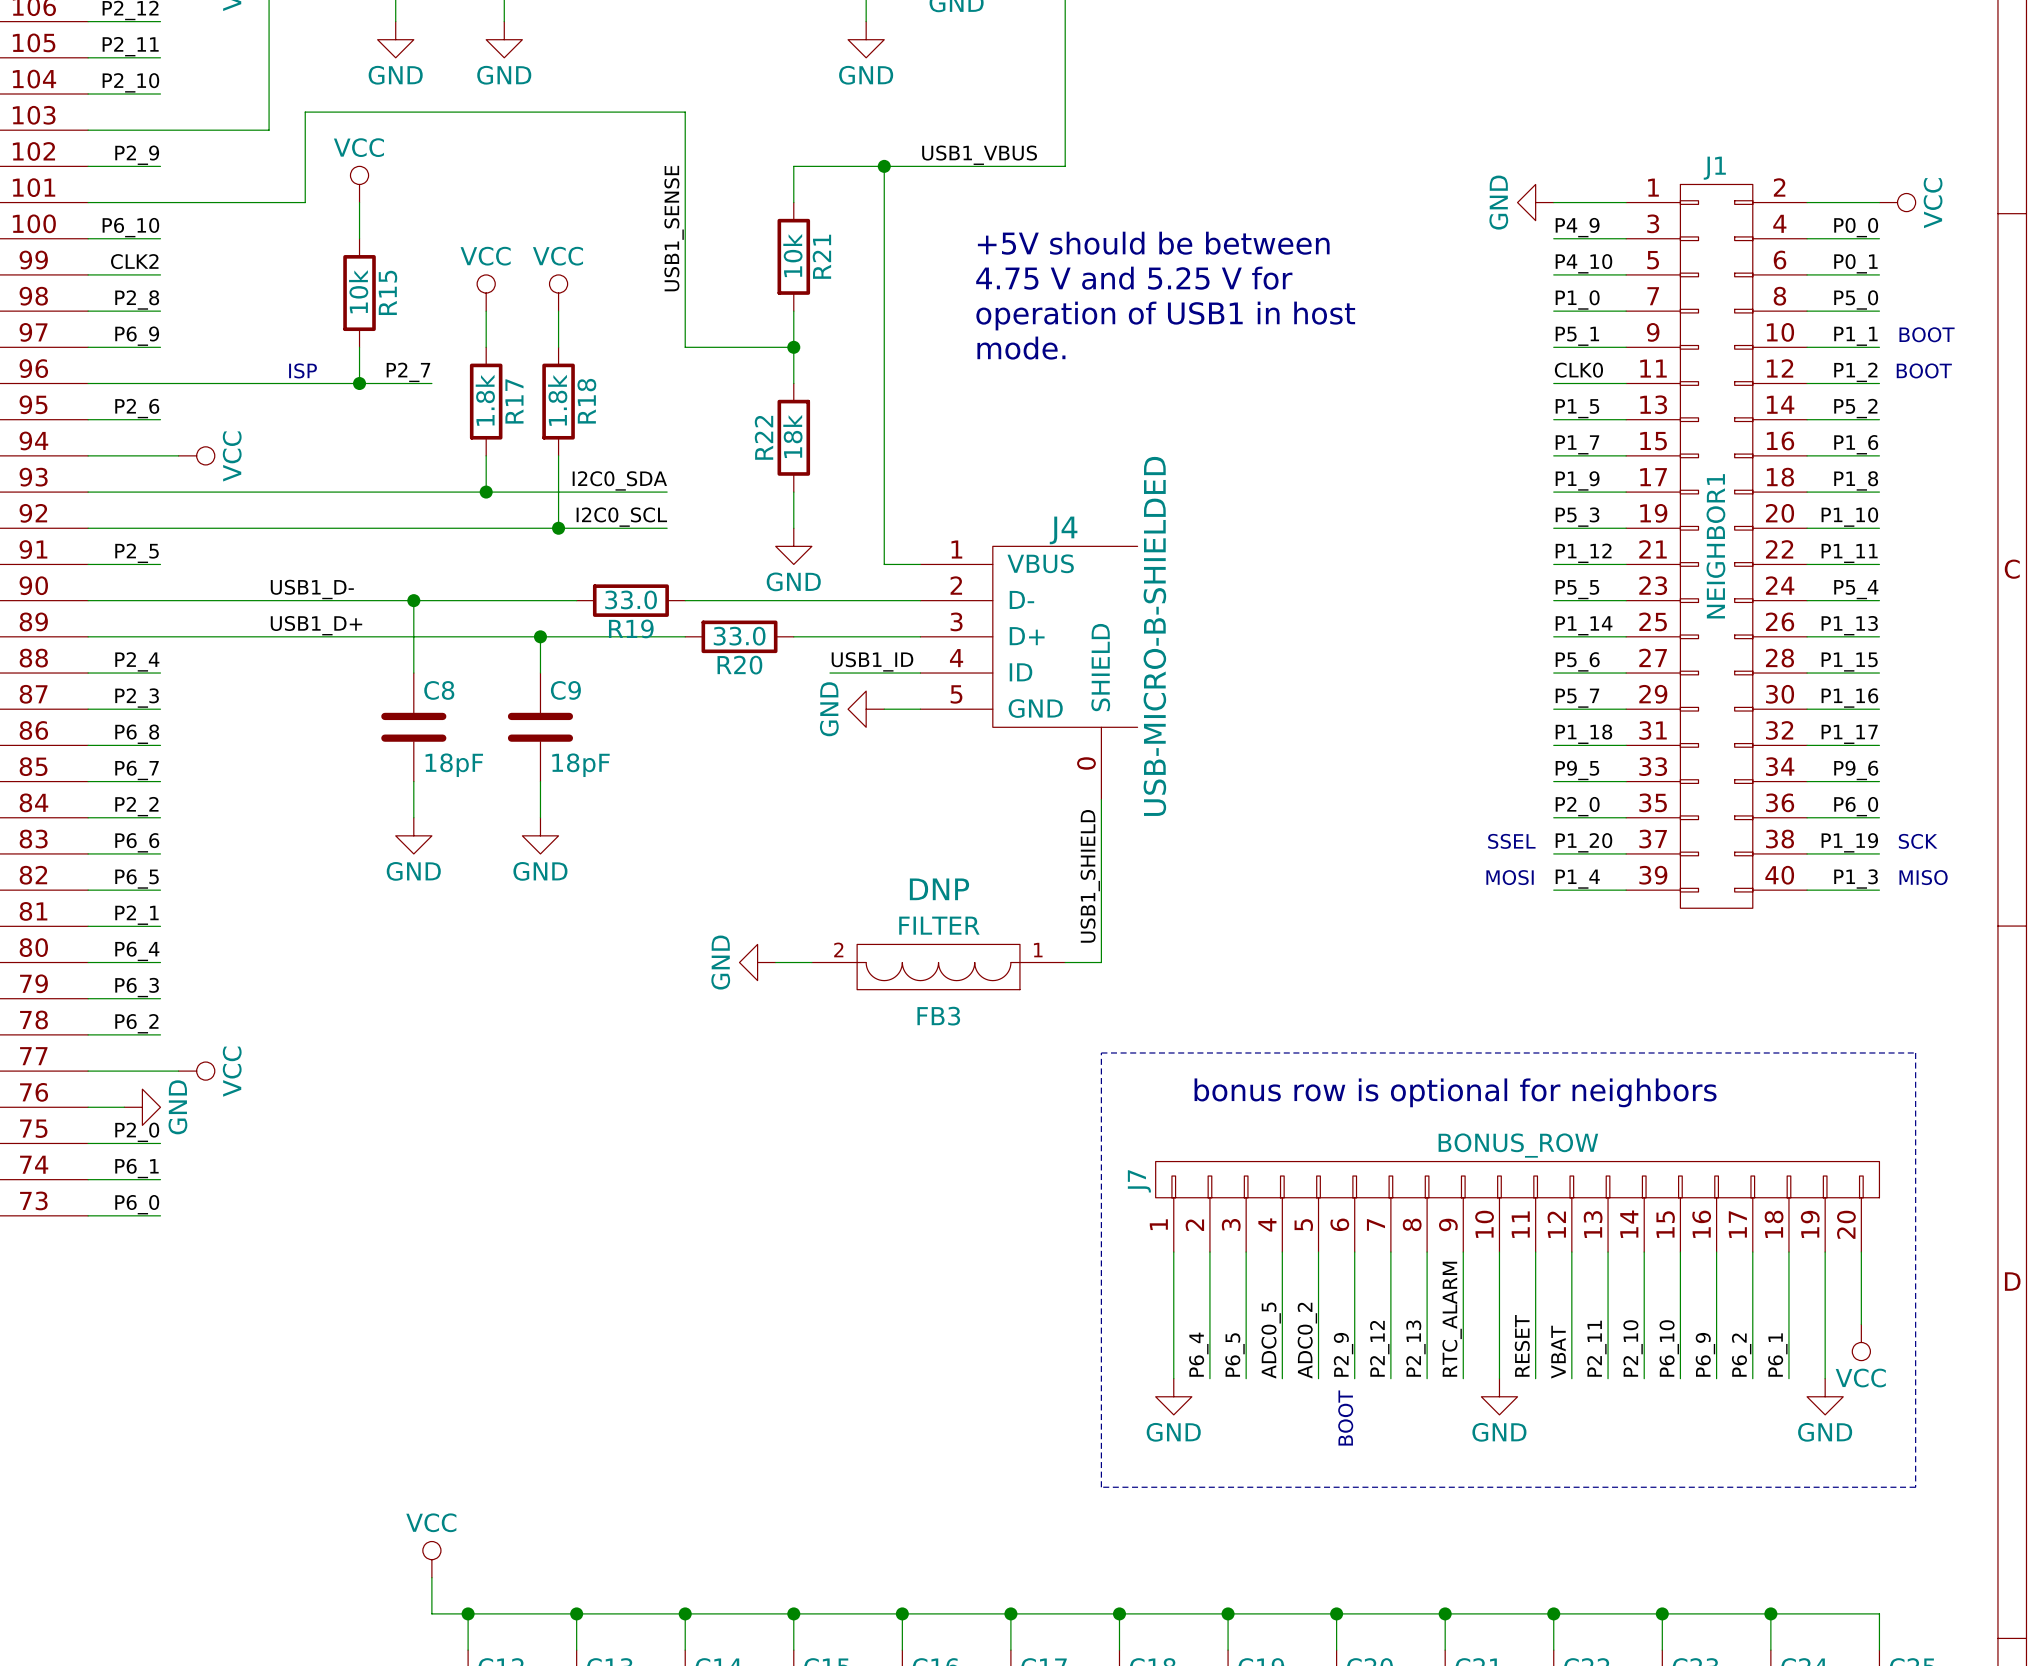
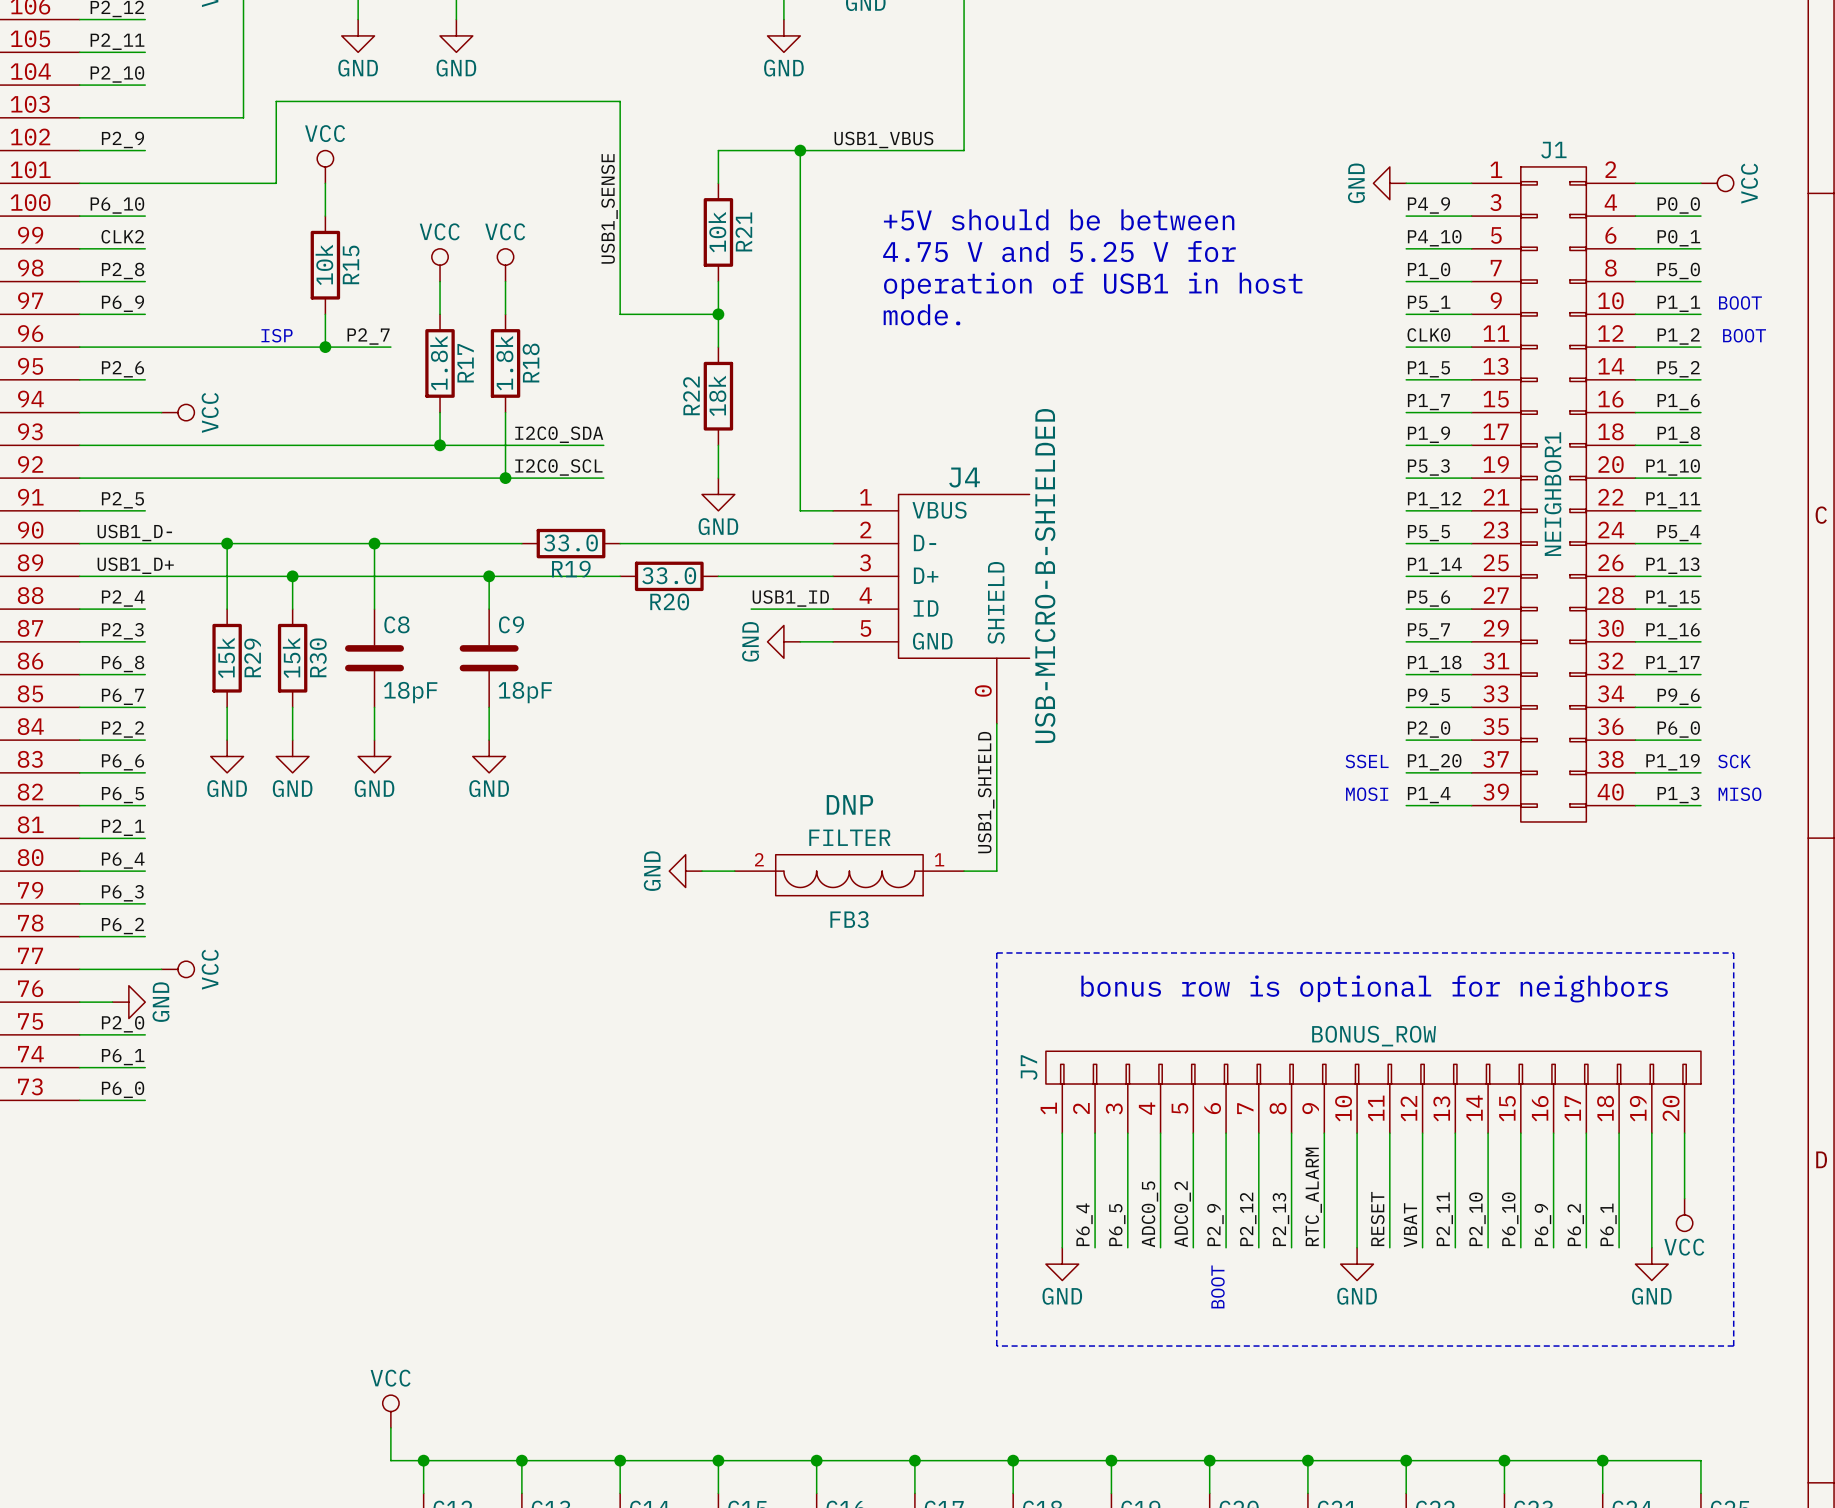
label position: USB1_D- (312, 589) -> USB1_D- (134, 532)
wire: none -> (227, 543) (227, 609)
junction: none -> (227, 543)
label position: USB1_D+ (316, 625) -> USB1_D+ (135, 565)
wire: none -> (292, 576) (292, 609)
junction: none -> (292, 576)
R29: none -> 15k (227, 658)
R30: none -> 15k (292, 658)
wire: none -> (227, 707) (227, 740)
wire: none -> (292, 707) (292, 740)
power symbol: none -> GND (227, 756)
power symbol: none -> GND (292, 756)

